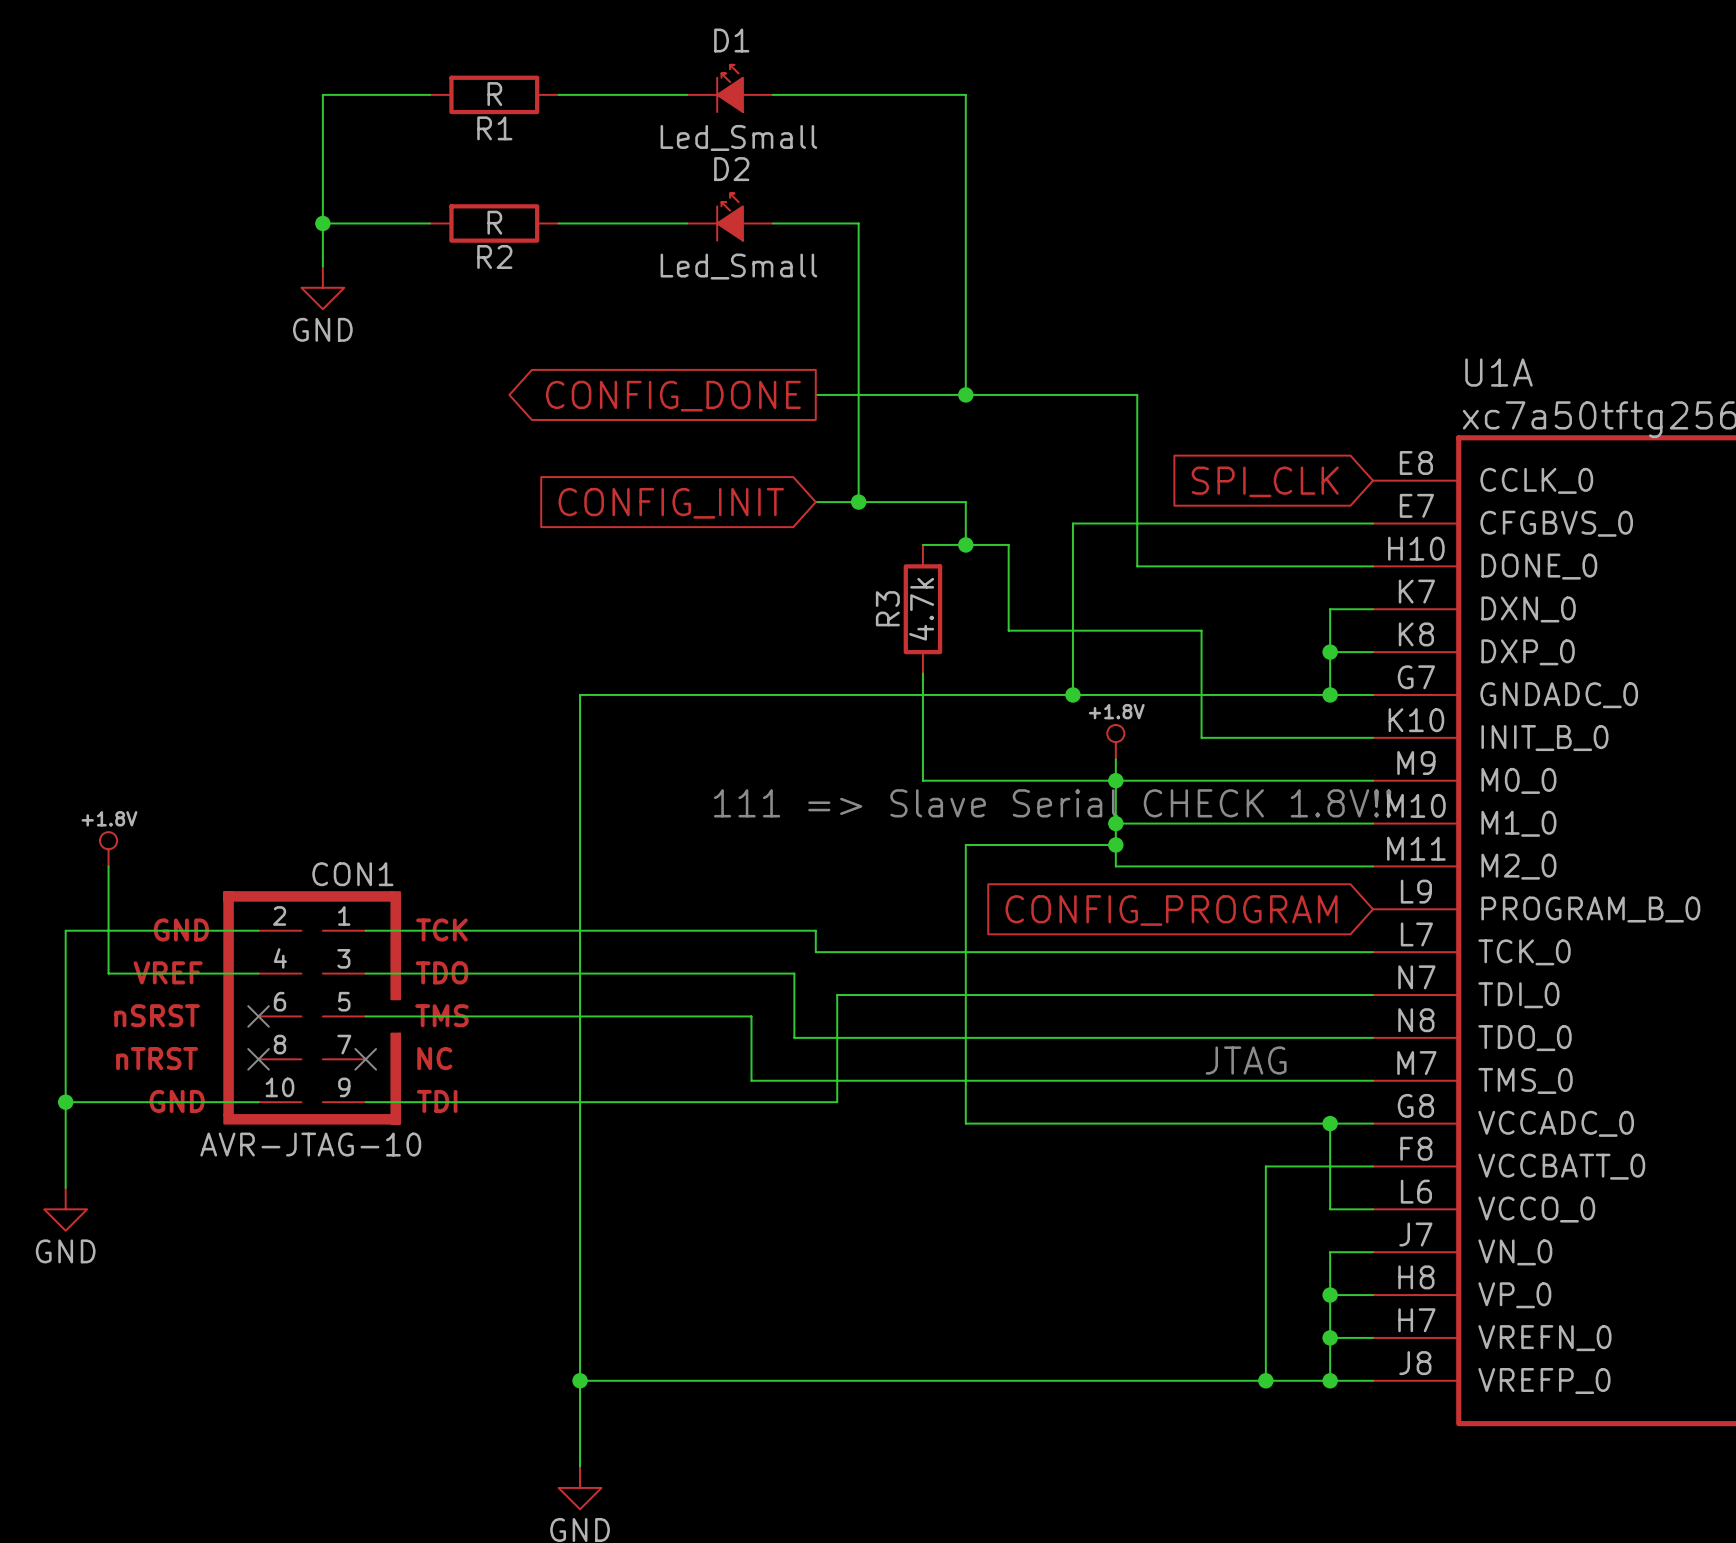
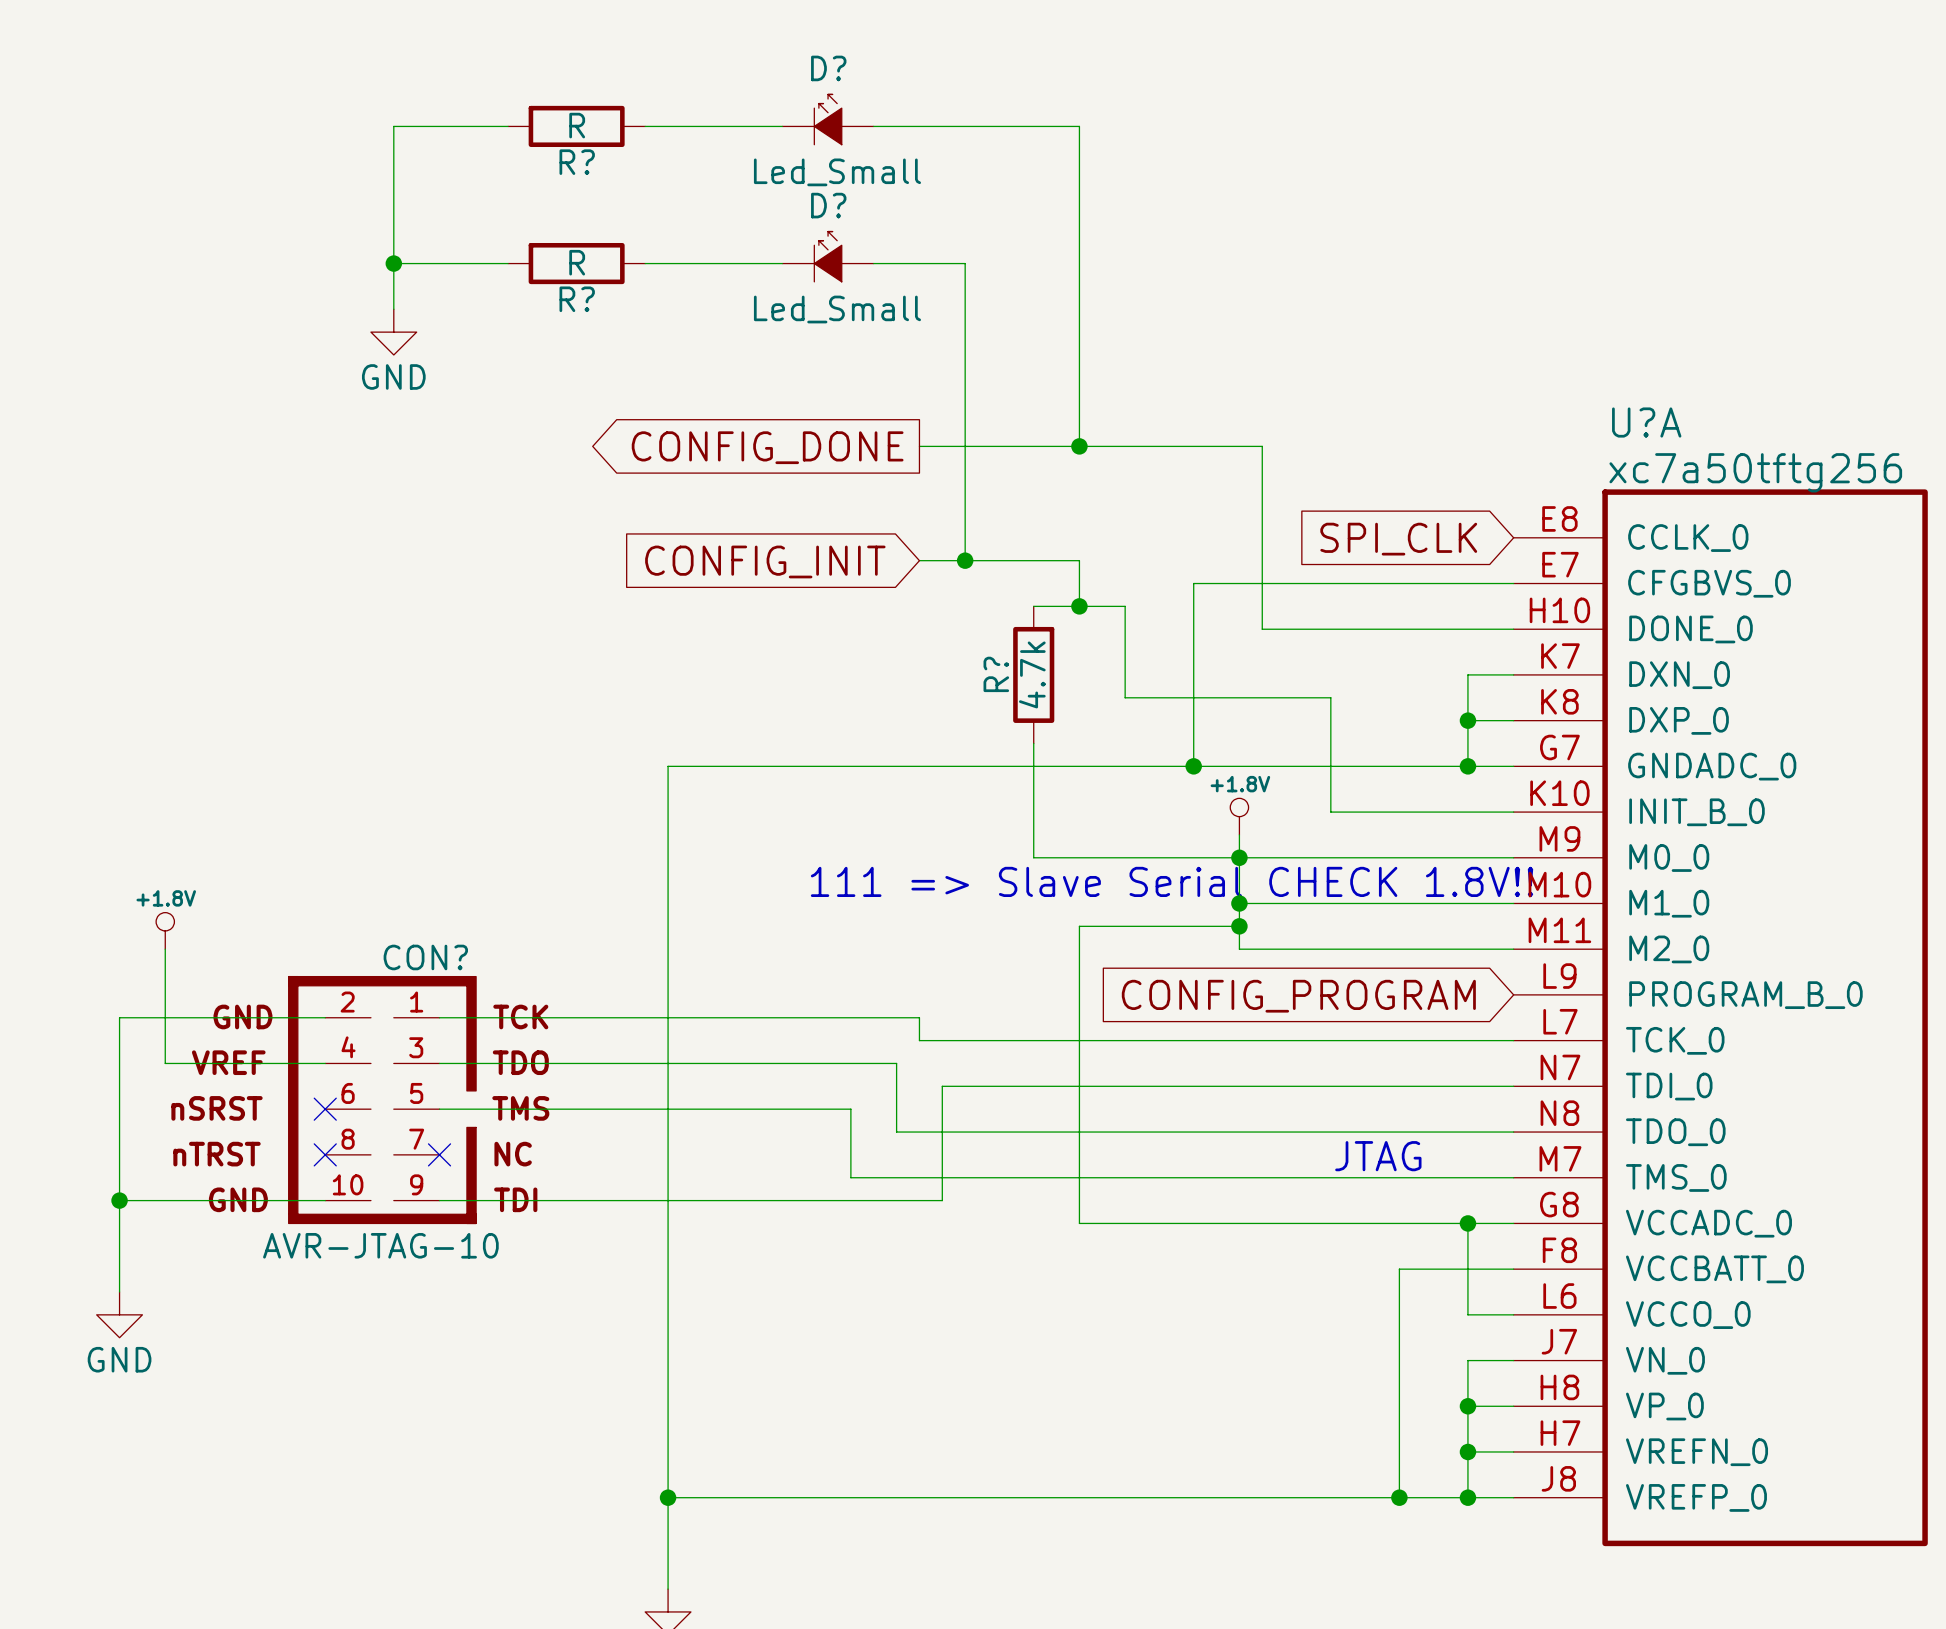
D1 name: D1 (731, 40) -> D? (828, 68)
R1 name: R1 (494, 128) -> R? (577, 162)
D2 name: D2 (731, 169) -> D? (828, 205)
R2 name: R2 (494, 256) -> R? (577, 299)
U1A name: U1A (1499, 372) -> U?A (1646, 422)
R3 name: R3 (887, 608) -> R? (996, 674)
CON1 name: CON1 (352, 874) -> CON? (425, 957)

